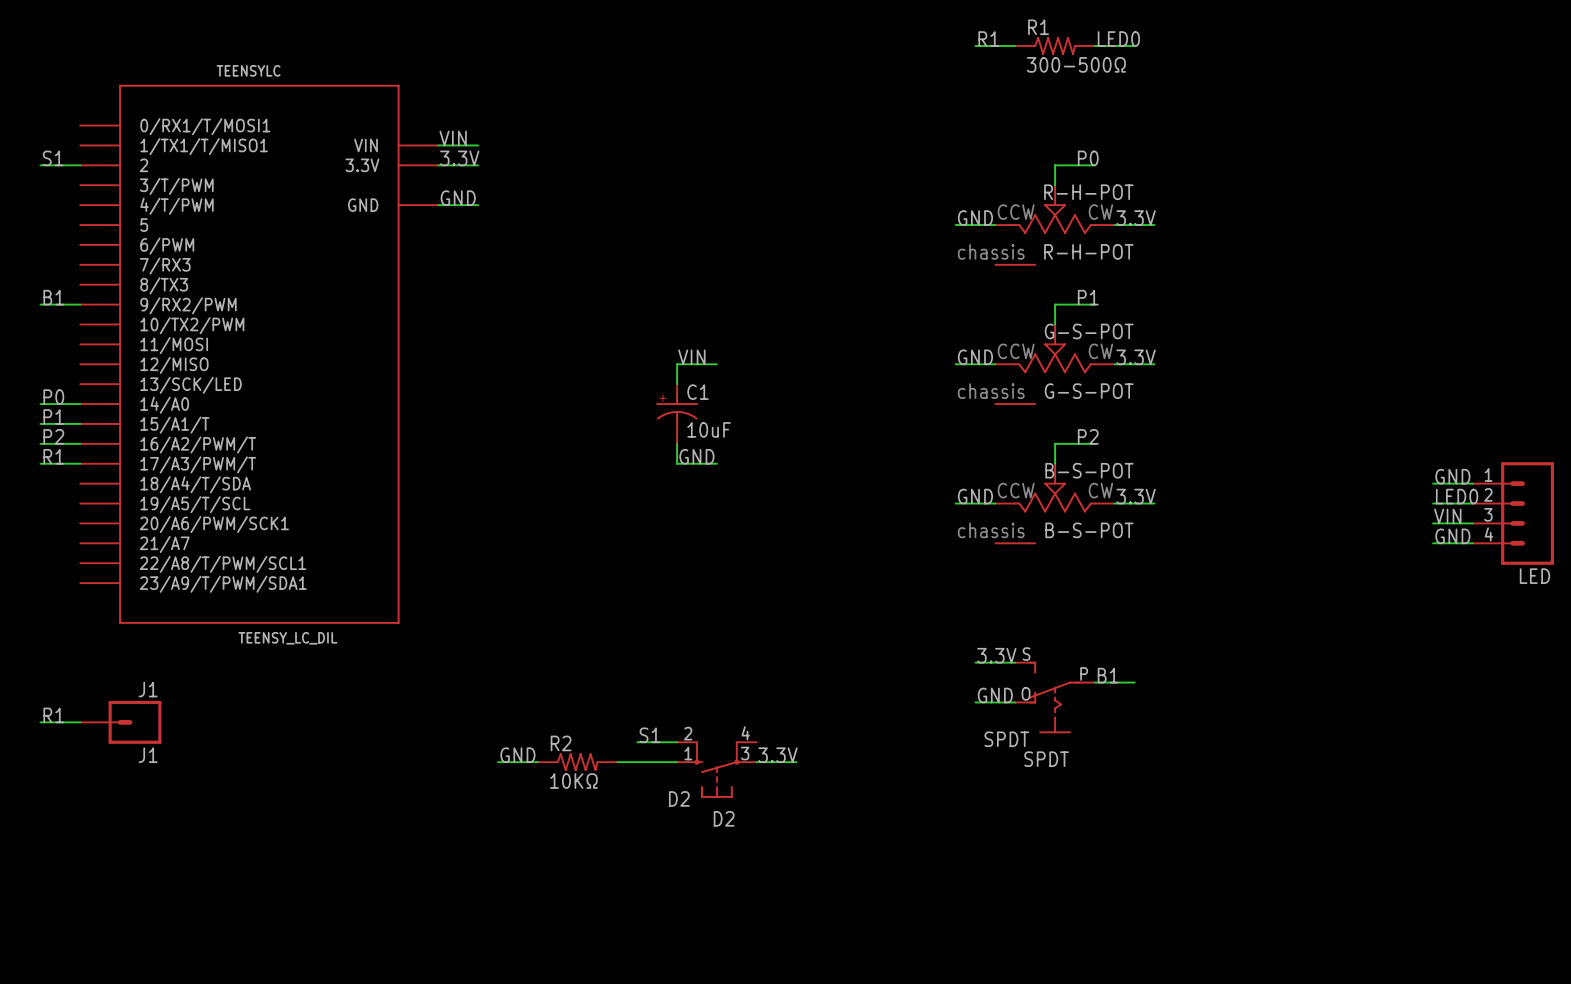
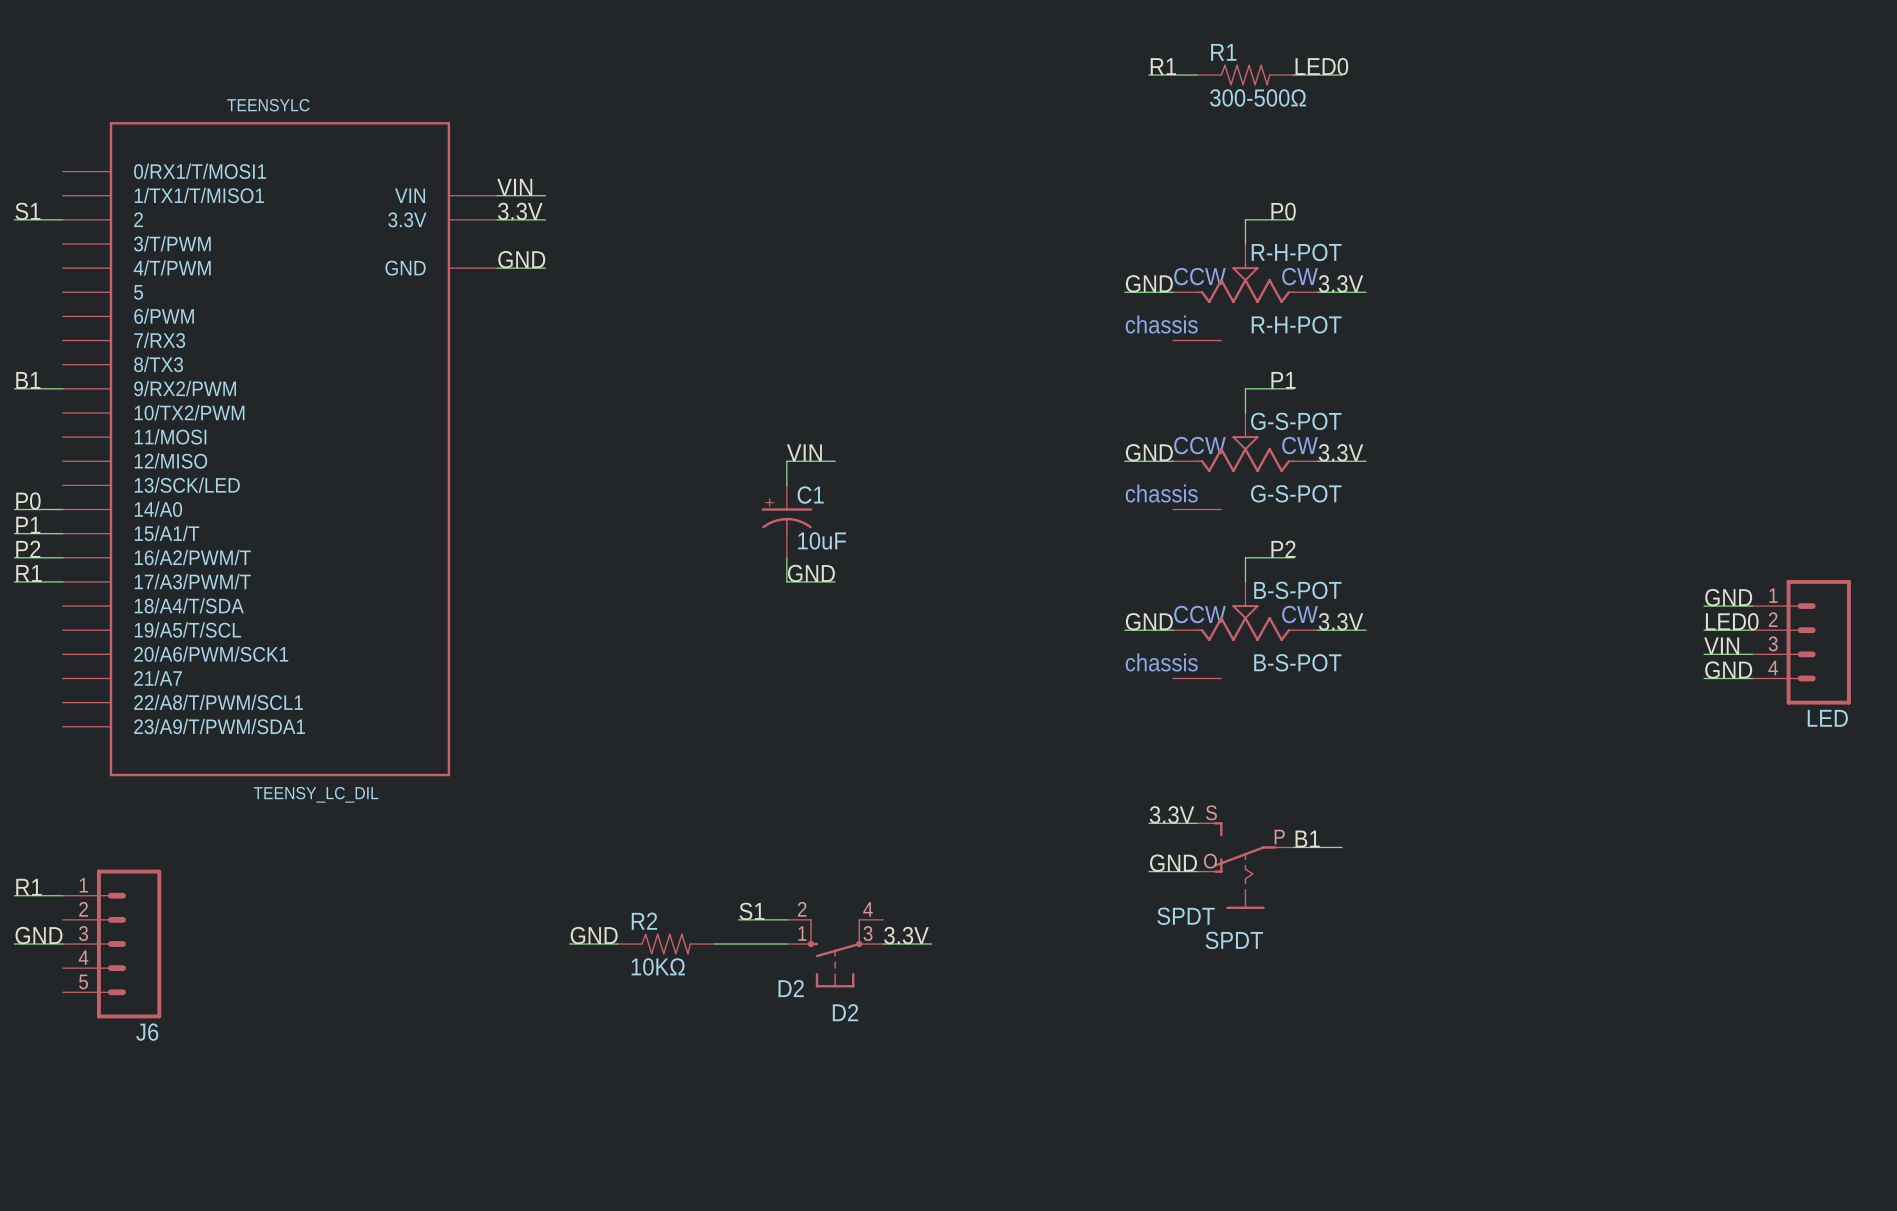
J1: J1 (120, 722) -> none
label: none -> GND (39, 935)
wire: none -> (14, 944) (62, 944)
J6: none -> (111, 944)

